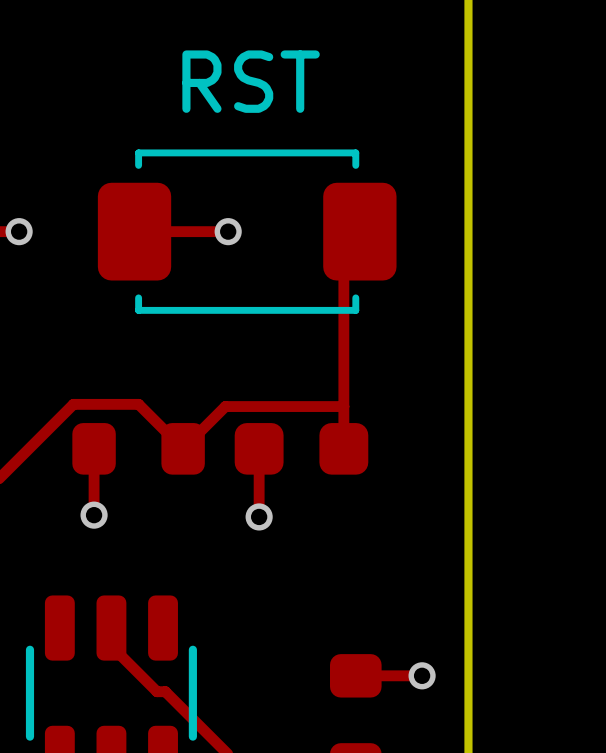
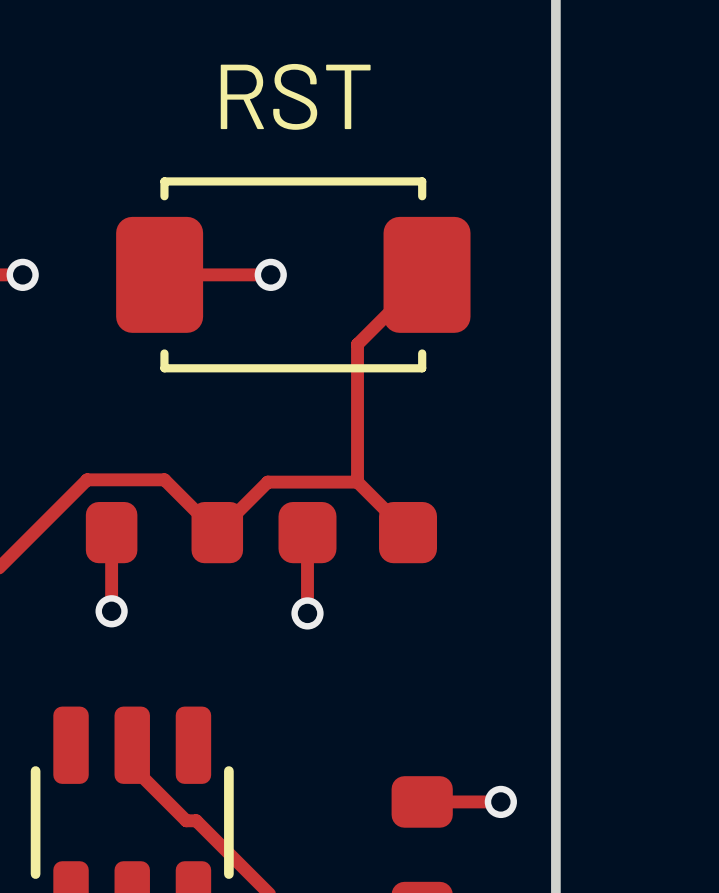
track: (343, 247) (343, 448) -> (408, 293) (357, 344) (357, 482) (408, 532)

